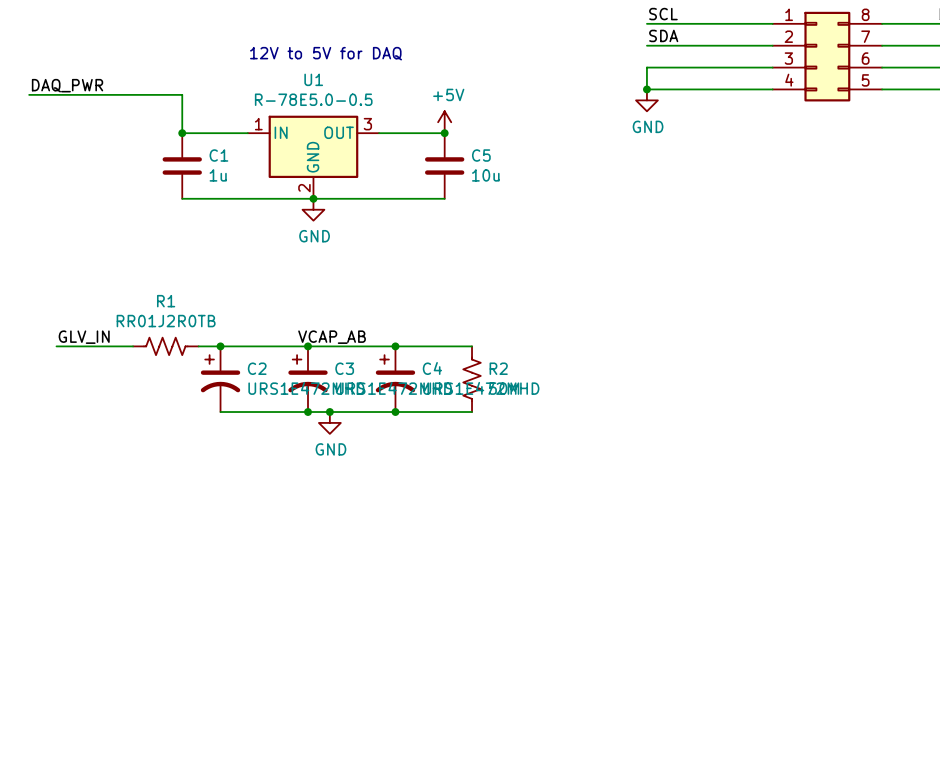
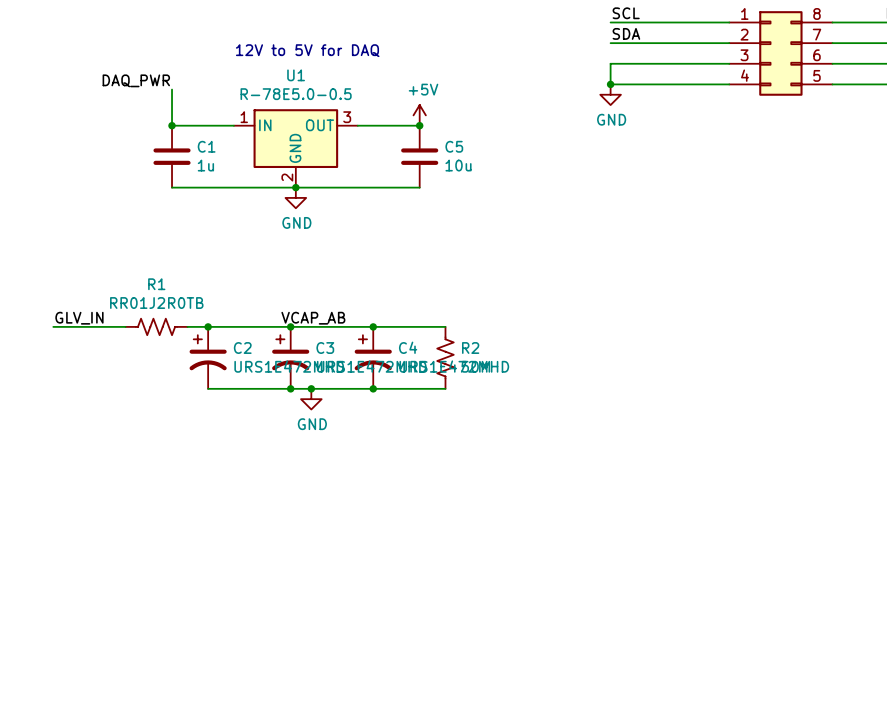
label position: DAQ_PWR (67, 85) -> DAQ_PWR (136, 80)
wire: (29, 94) (182, 94) -> none

